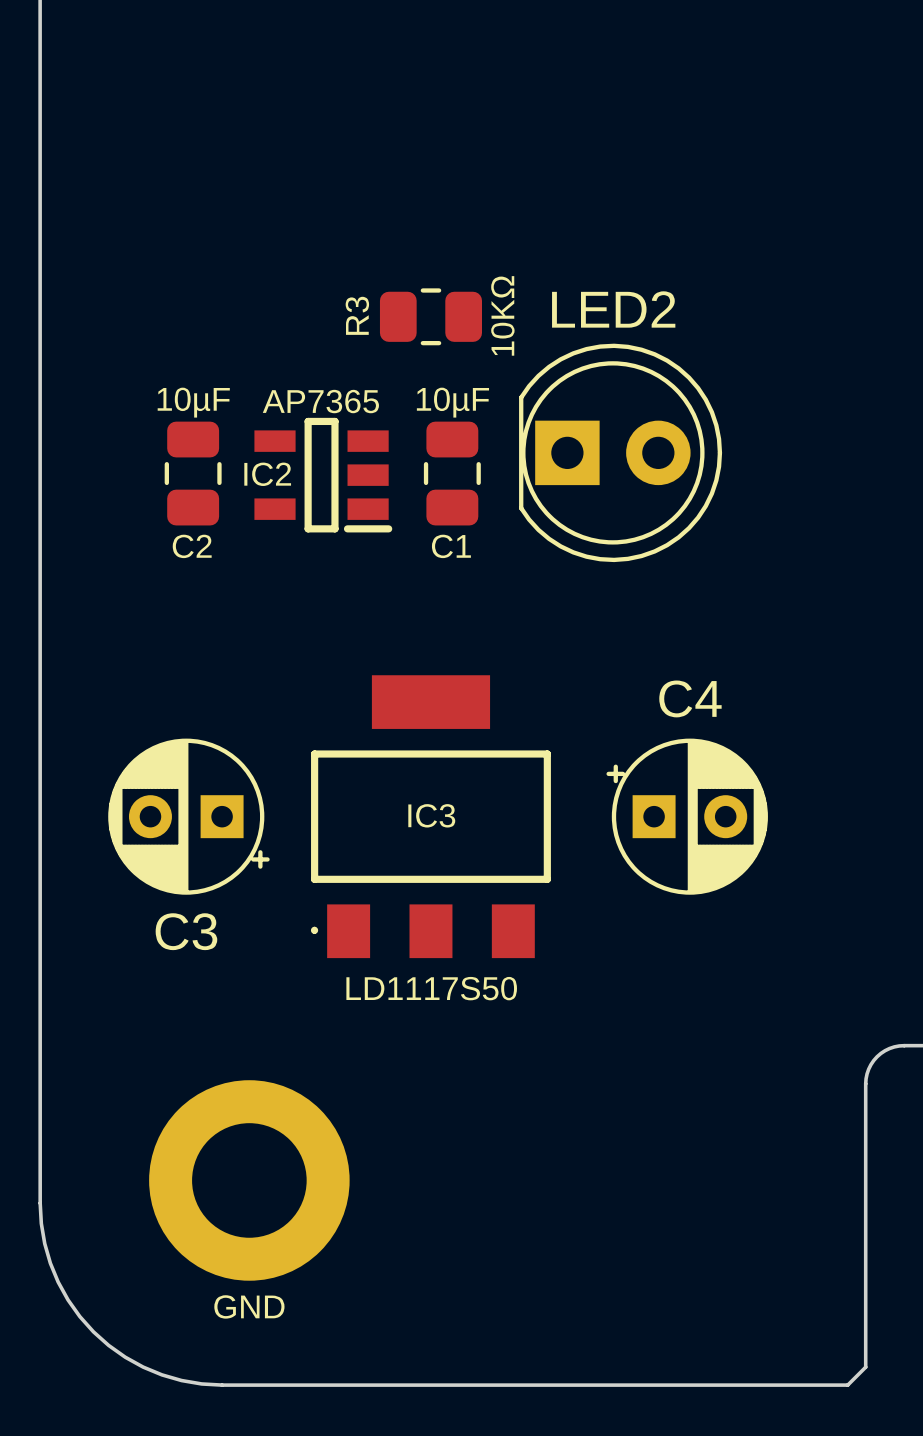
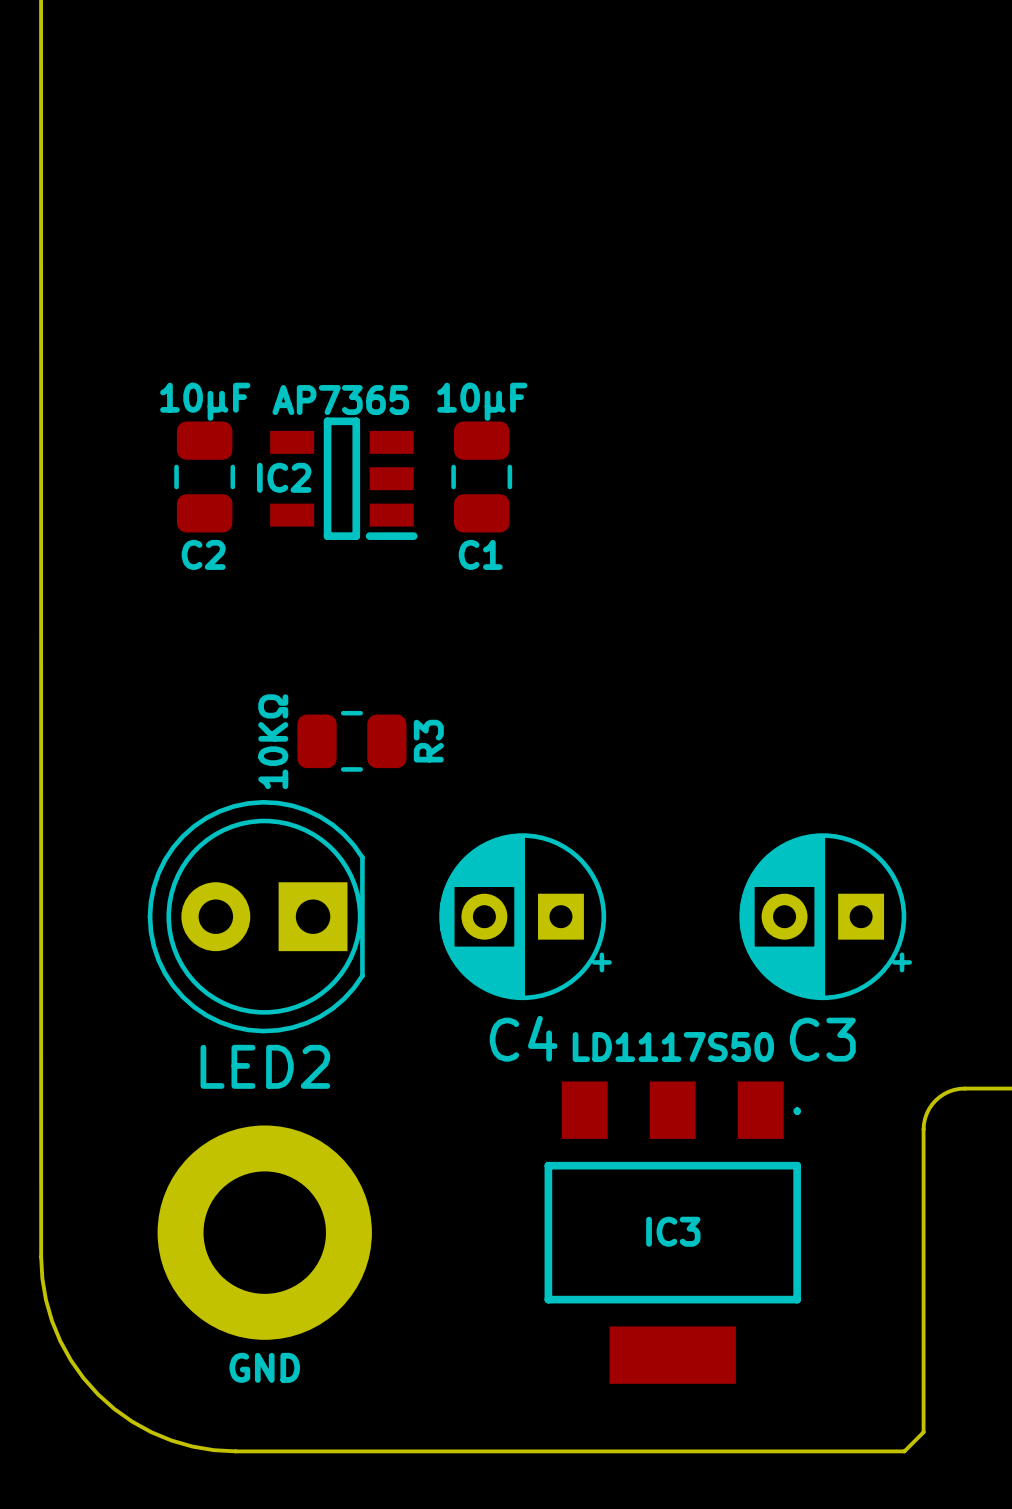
LED2 name position: LED2 (613, 309) -> LED2 (265, 1066)
R3 name position: R3 (357, 315) -> R3 (428, 741)
R3 value position: 10KΩ (502, 315) -> 10KΩ (273, 741)
R3 position: (430, 316) -> (351, 741)
LED2 footprint: [519, 343, 723, 563] -> [147, 799, 365, 1034]
C3 position: (188, 816) -> (825, 916)
IC3 rotation: 0° (430, 816) -> 180° (672, 1232)
IC3 position: (430, 816) -> (672, 1232)
C4 rotation: 0° (687, 816) -> 180° (525, 916)
C4 position: (687, 816) -> (525, 916)

